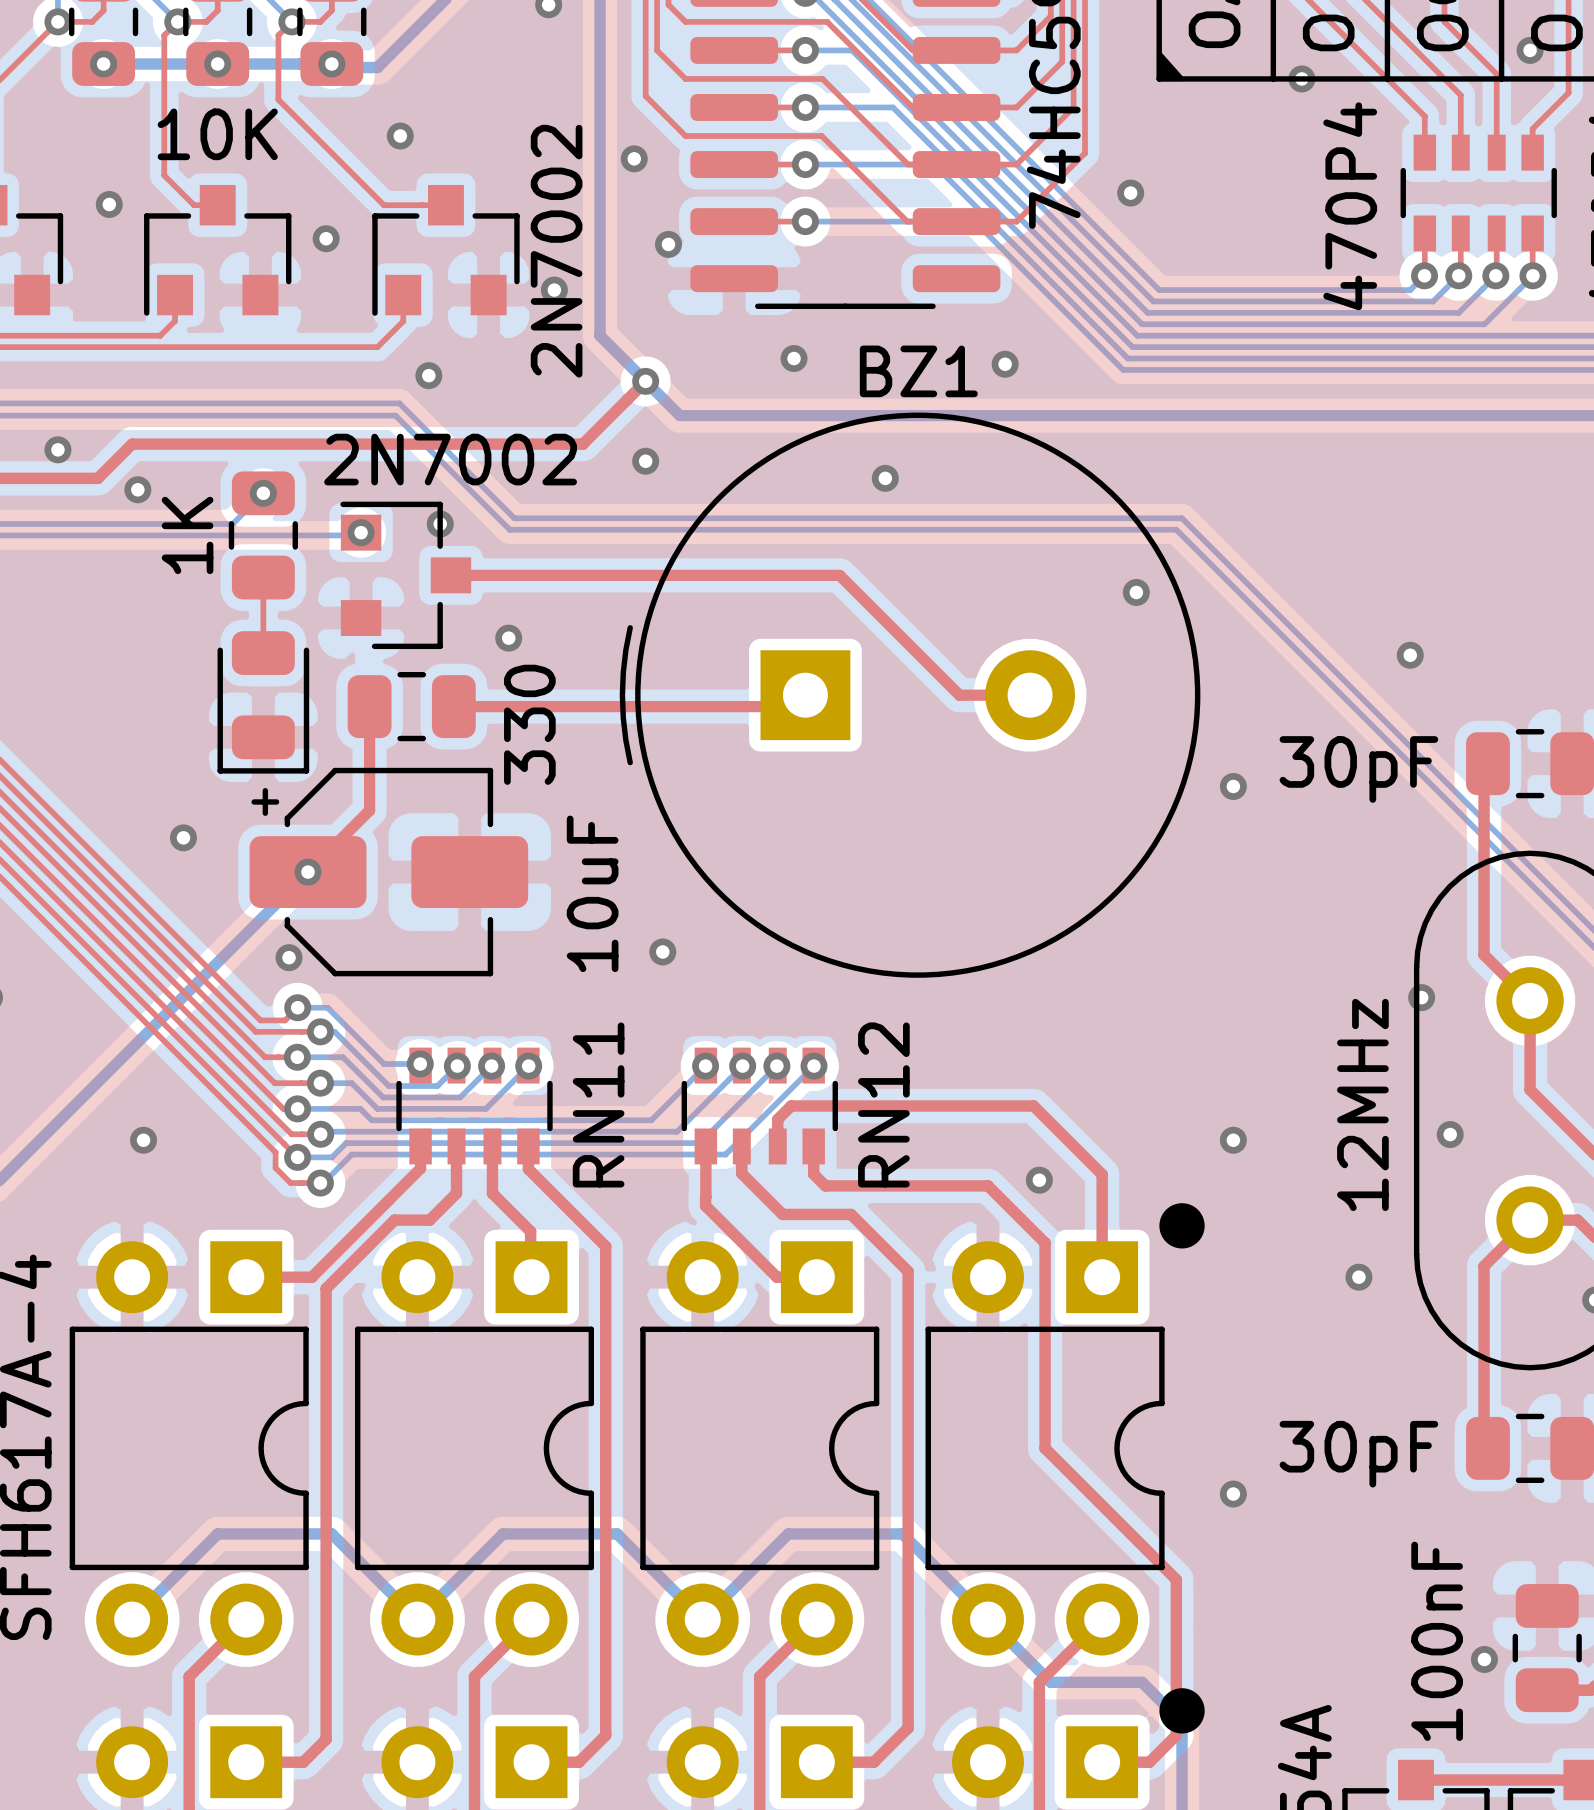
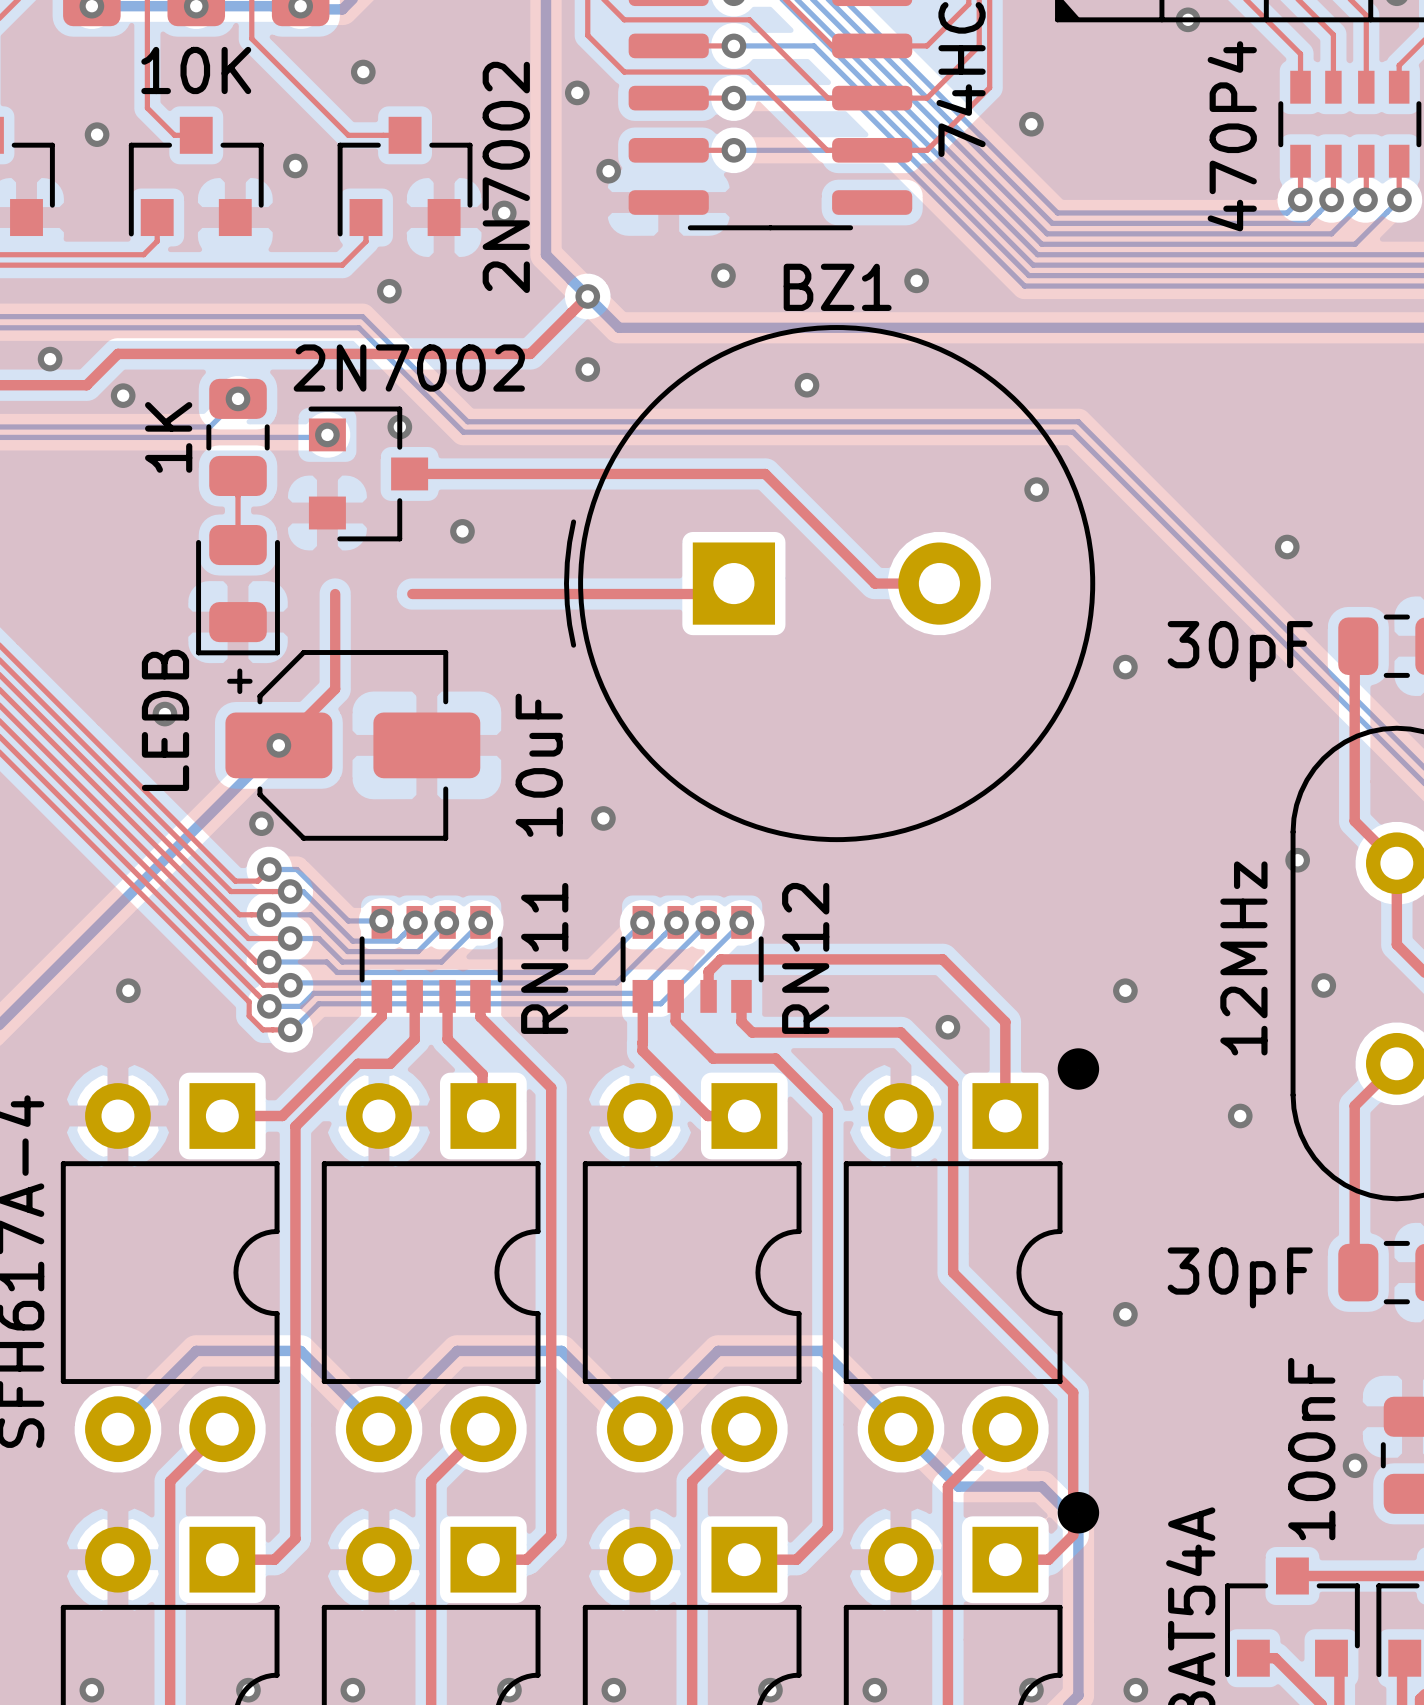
part: 330 (411, 706) -> none
part value: none -> LEDB (165, 720)

